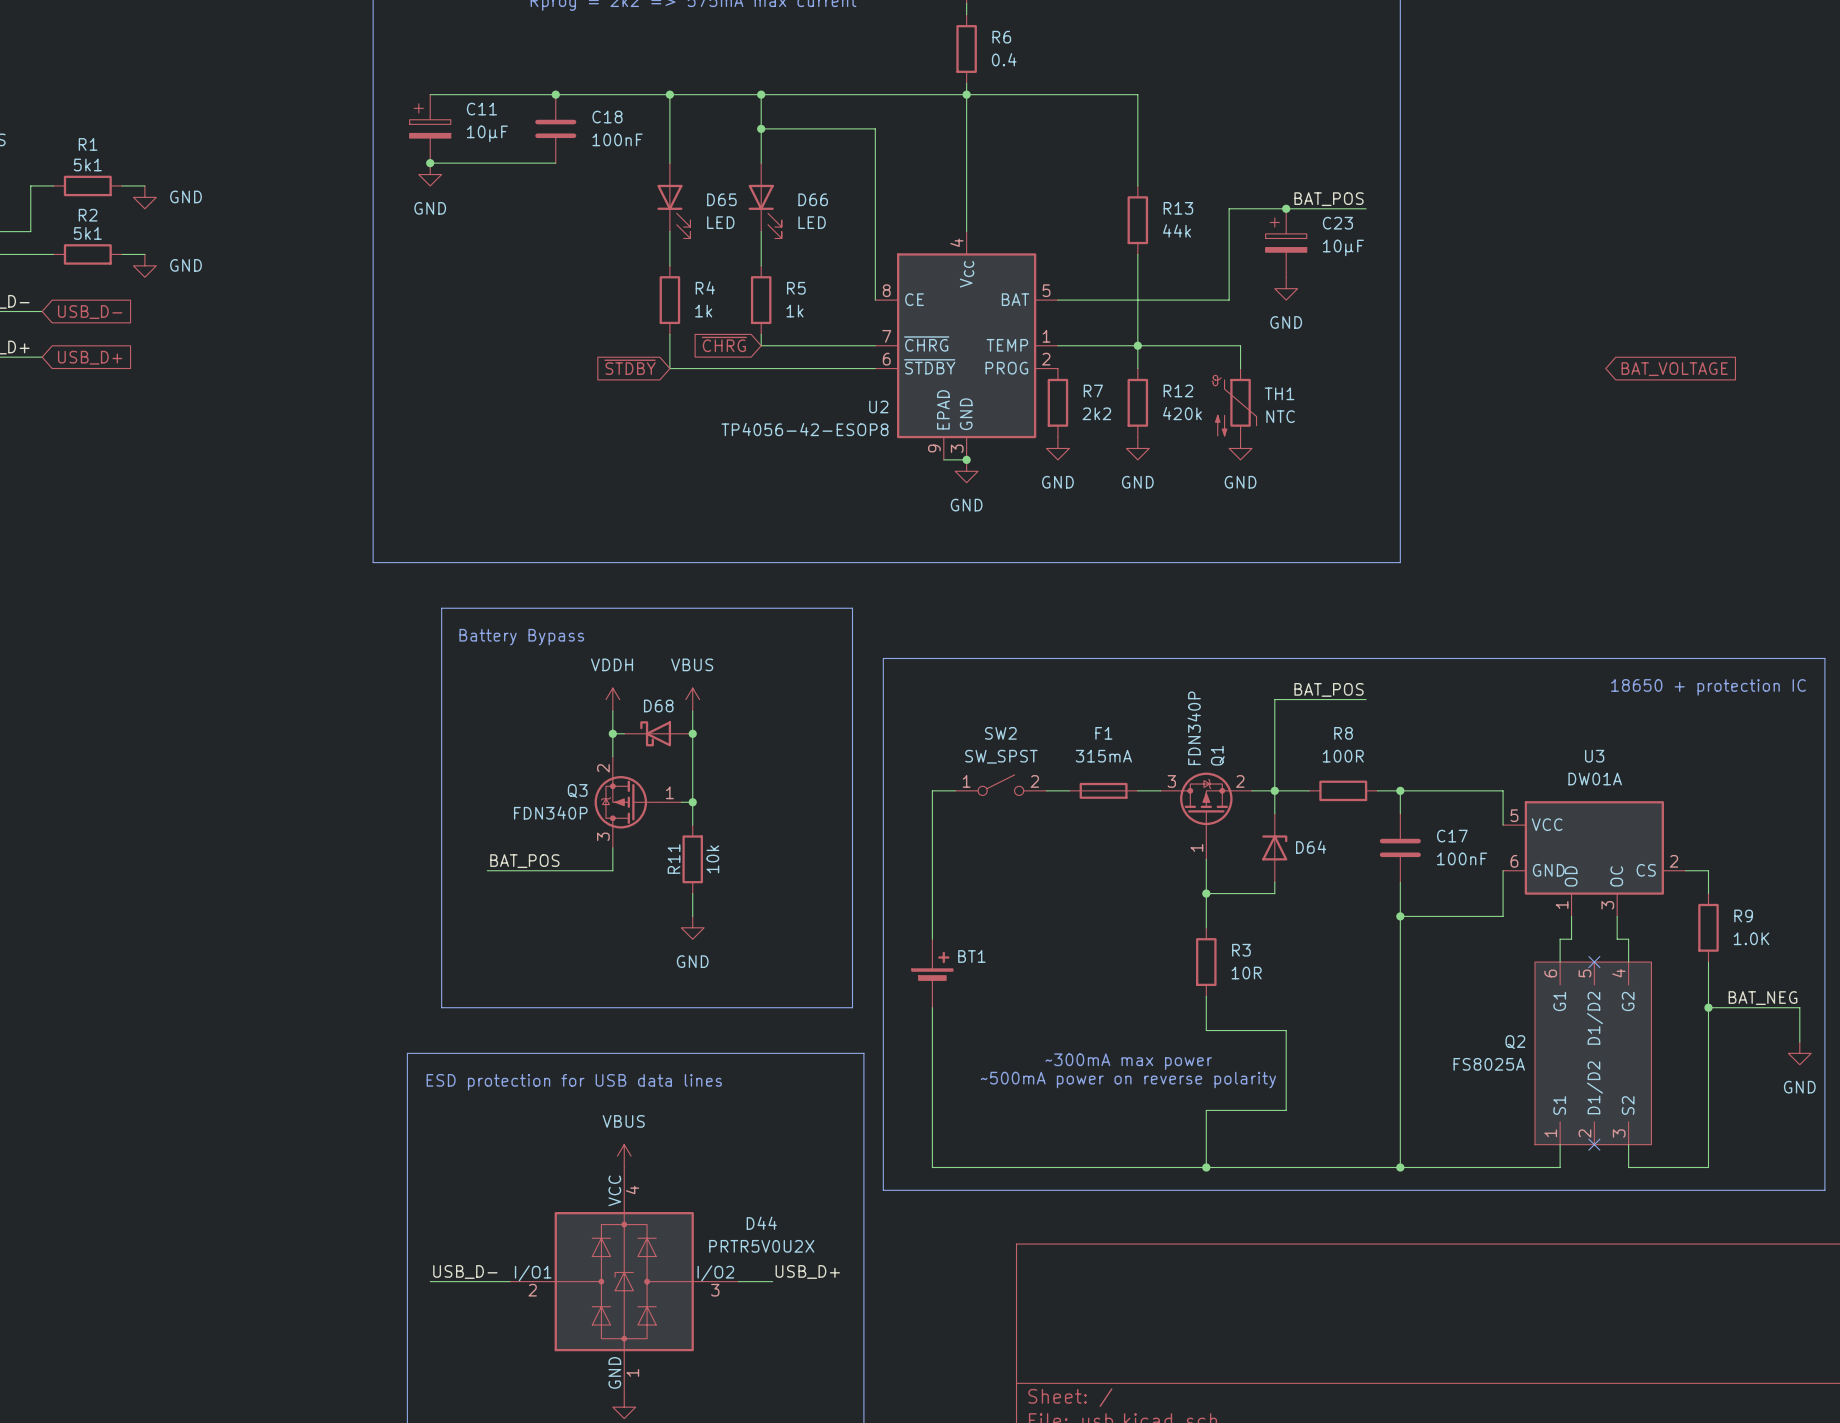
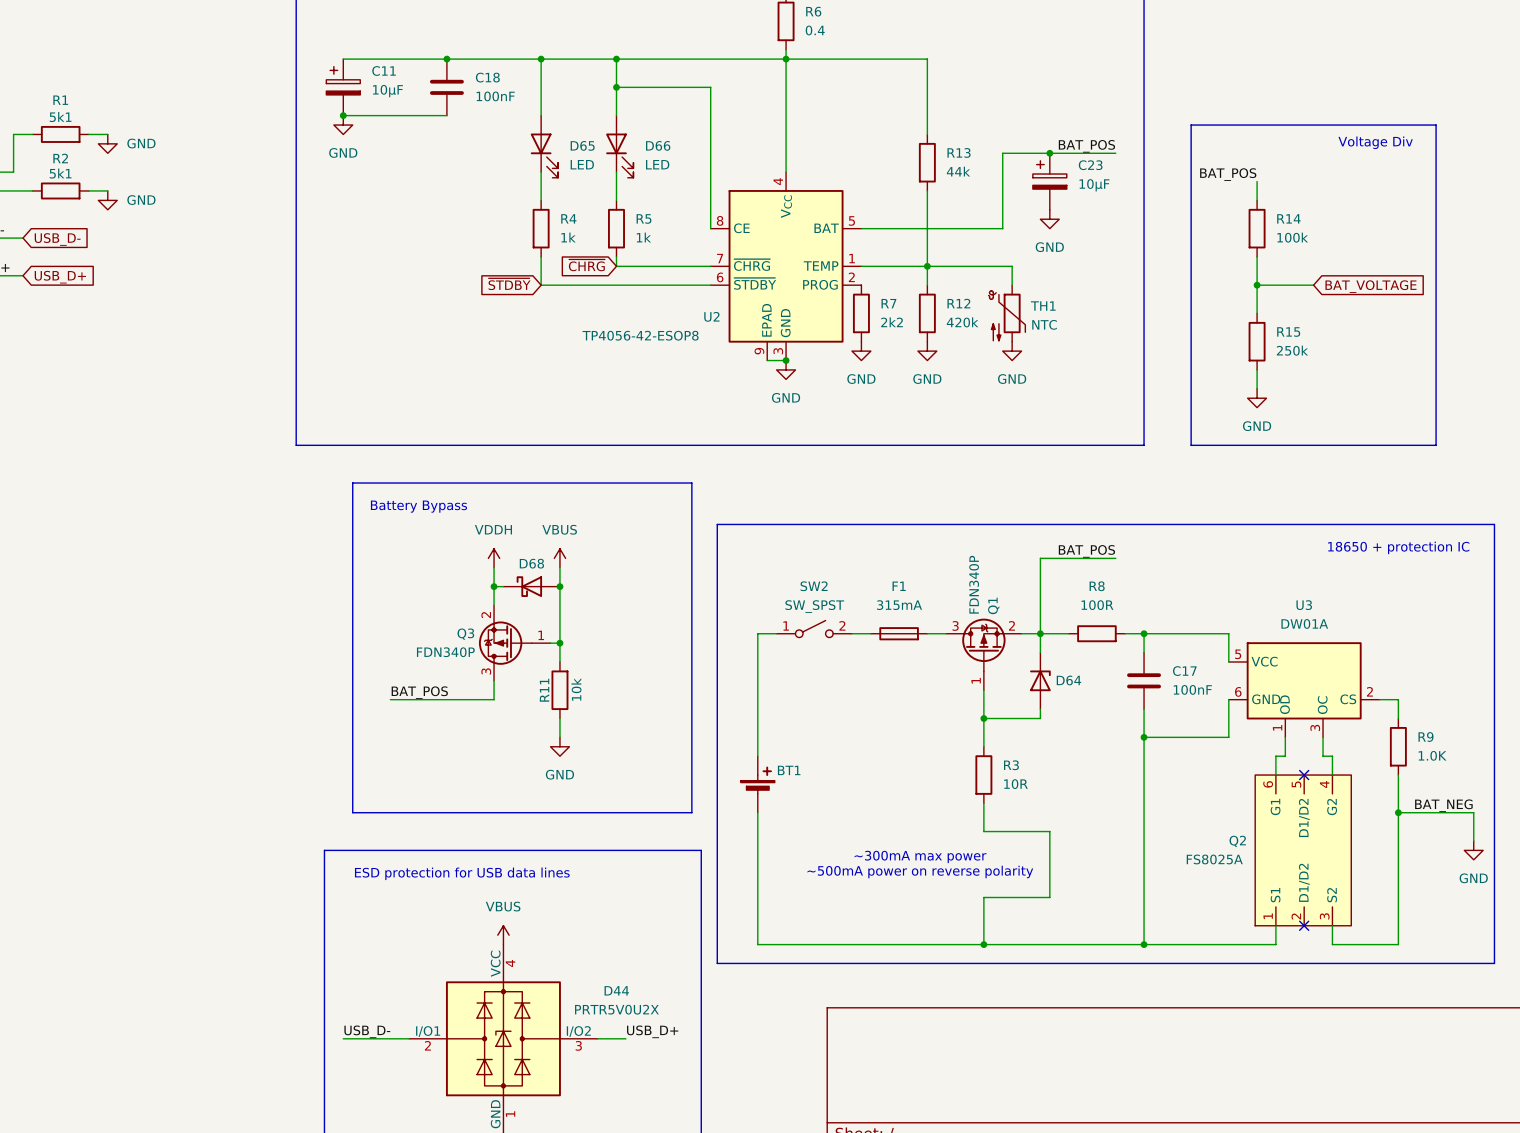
line: none -> (1191, 125) (1436, 125) (1436, 445) (1191, 445) (1191, 125)
text: none -> Voltage Div (1375, 142)
label: none -> BAT_POS (1228, 174)
wire: none -> (1257, 181) (1257, 200)
R14: none -> 100k (1257, 228)
wire: none -> (1257, 256) (1257, 313)
wire: none -> (1257, 285) (1313, 285)
junction: none -> (1257, 285)
R15: none -> 250k (1257, 341)
wire: none -> (1257, 369) (1257, 388)
power symbol: none -> GND (1257, 398)

